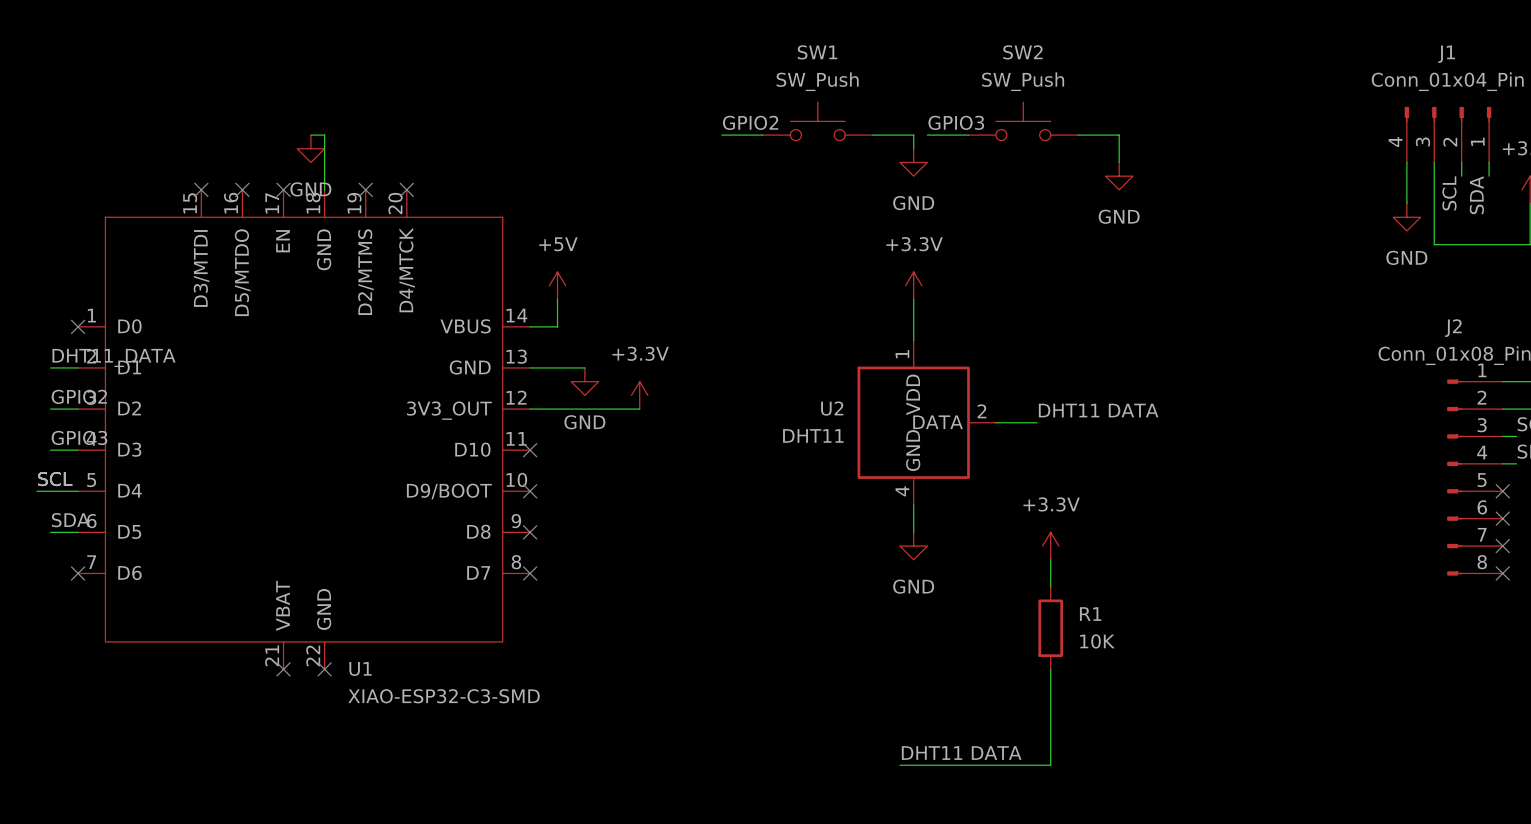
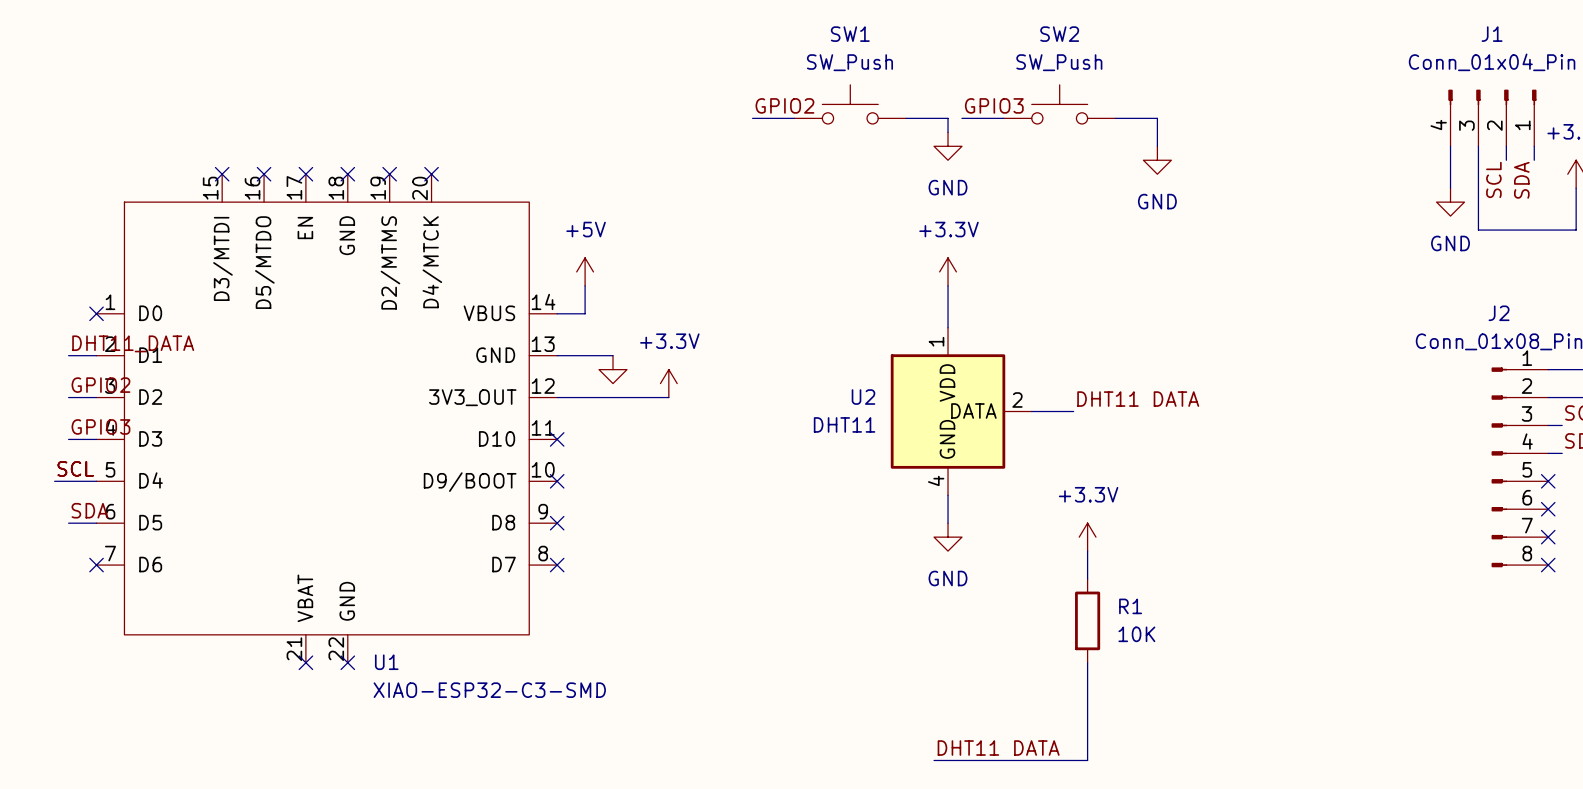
wire: (310, 135) (324, 135) (324, 189) -> none
power symbol: GND (310, 148) -> none
no-connect mark: none -> (347, 174)
power symbol text: GND (584, 422) -> none

